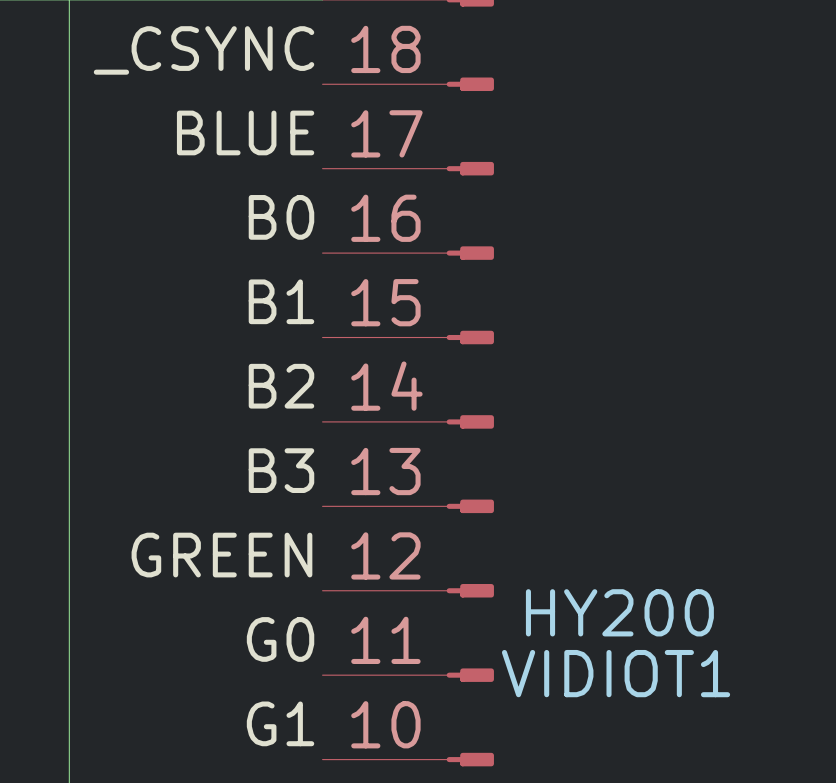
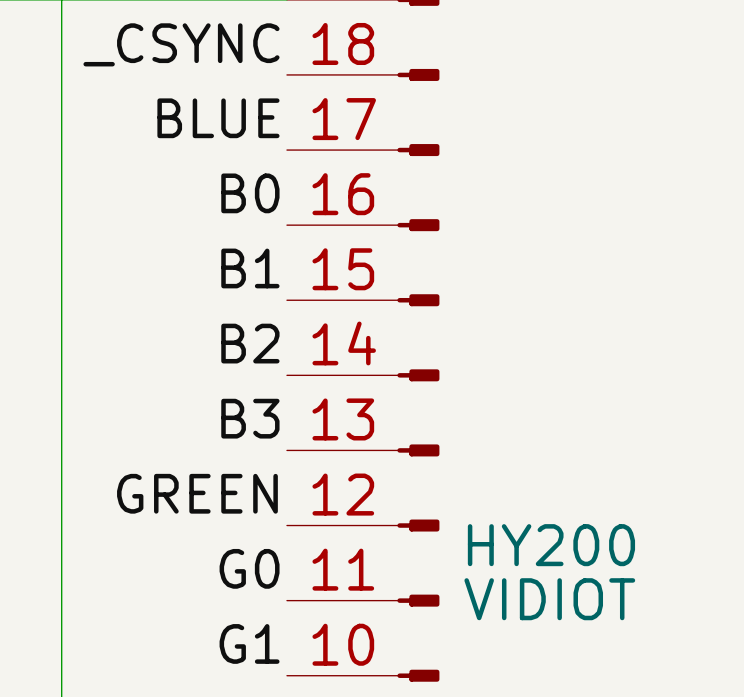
VIDIOT1 name: VIDIOT1 (616, 673) -> VIDIOT (549, 599)

